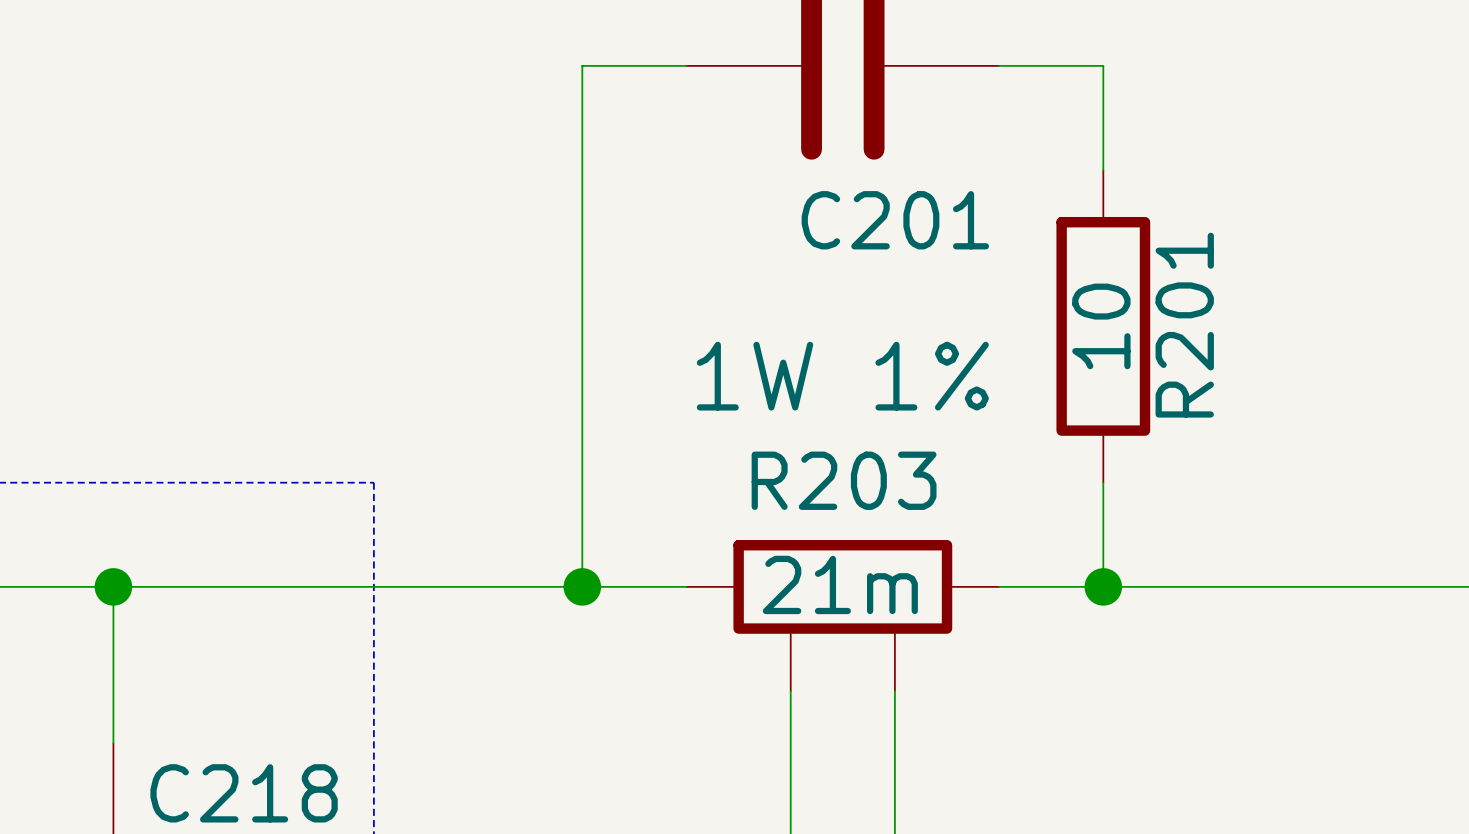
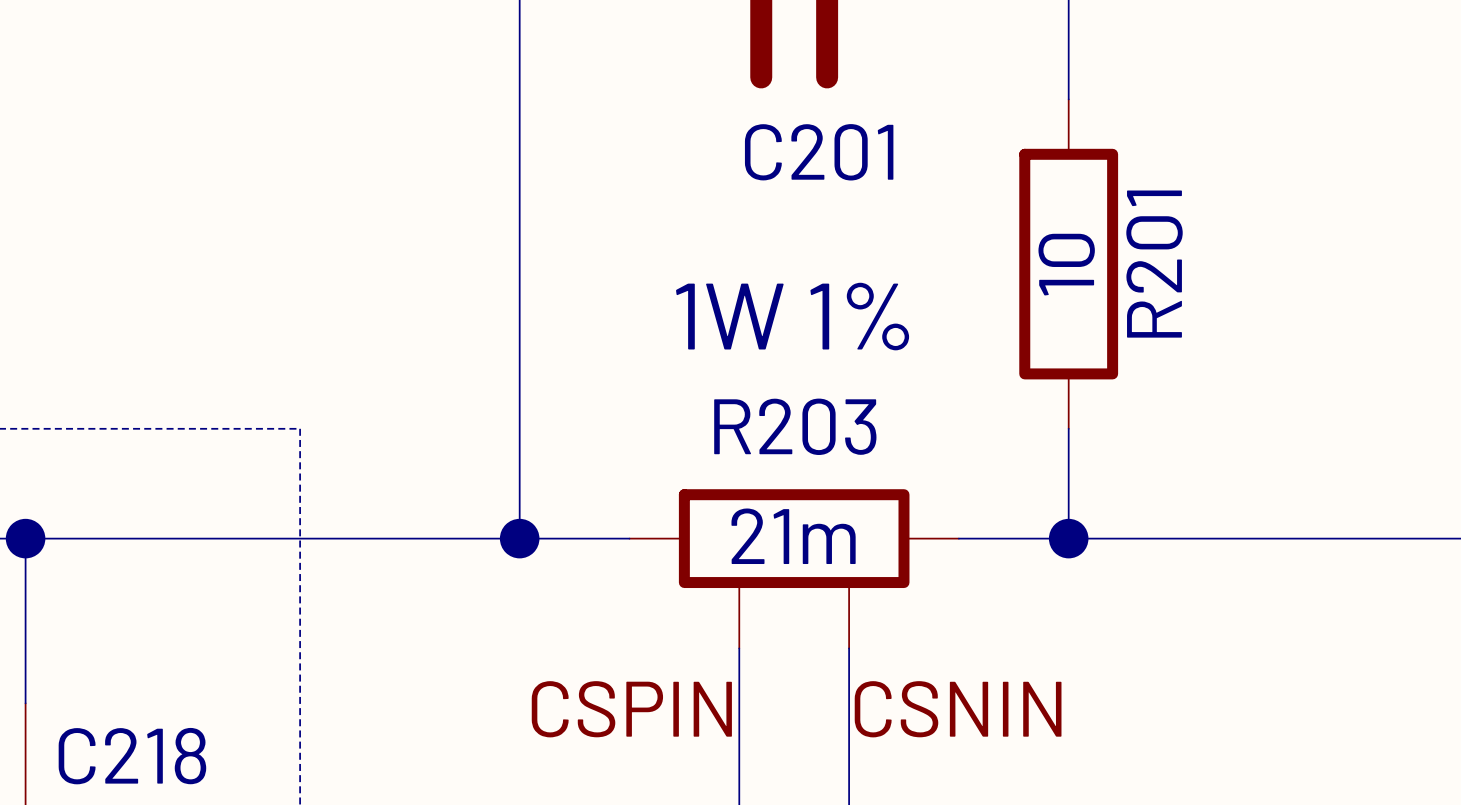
label: none -> CSPIN (631, 709)
label: none -> CSNIN (958, 709)

